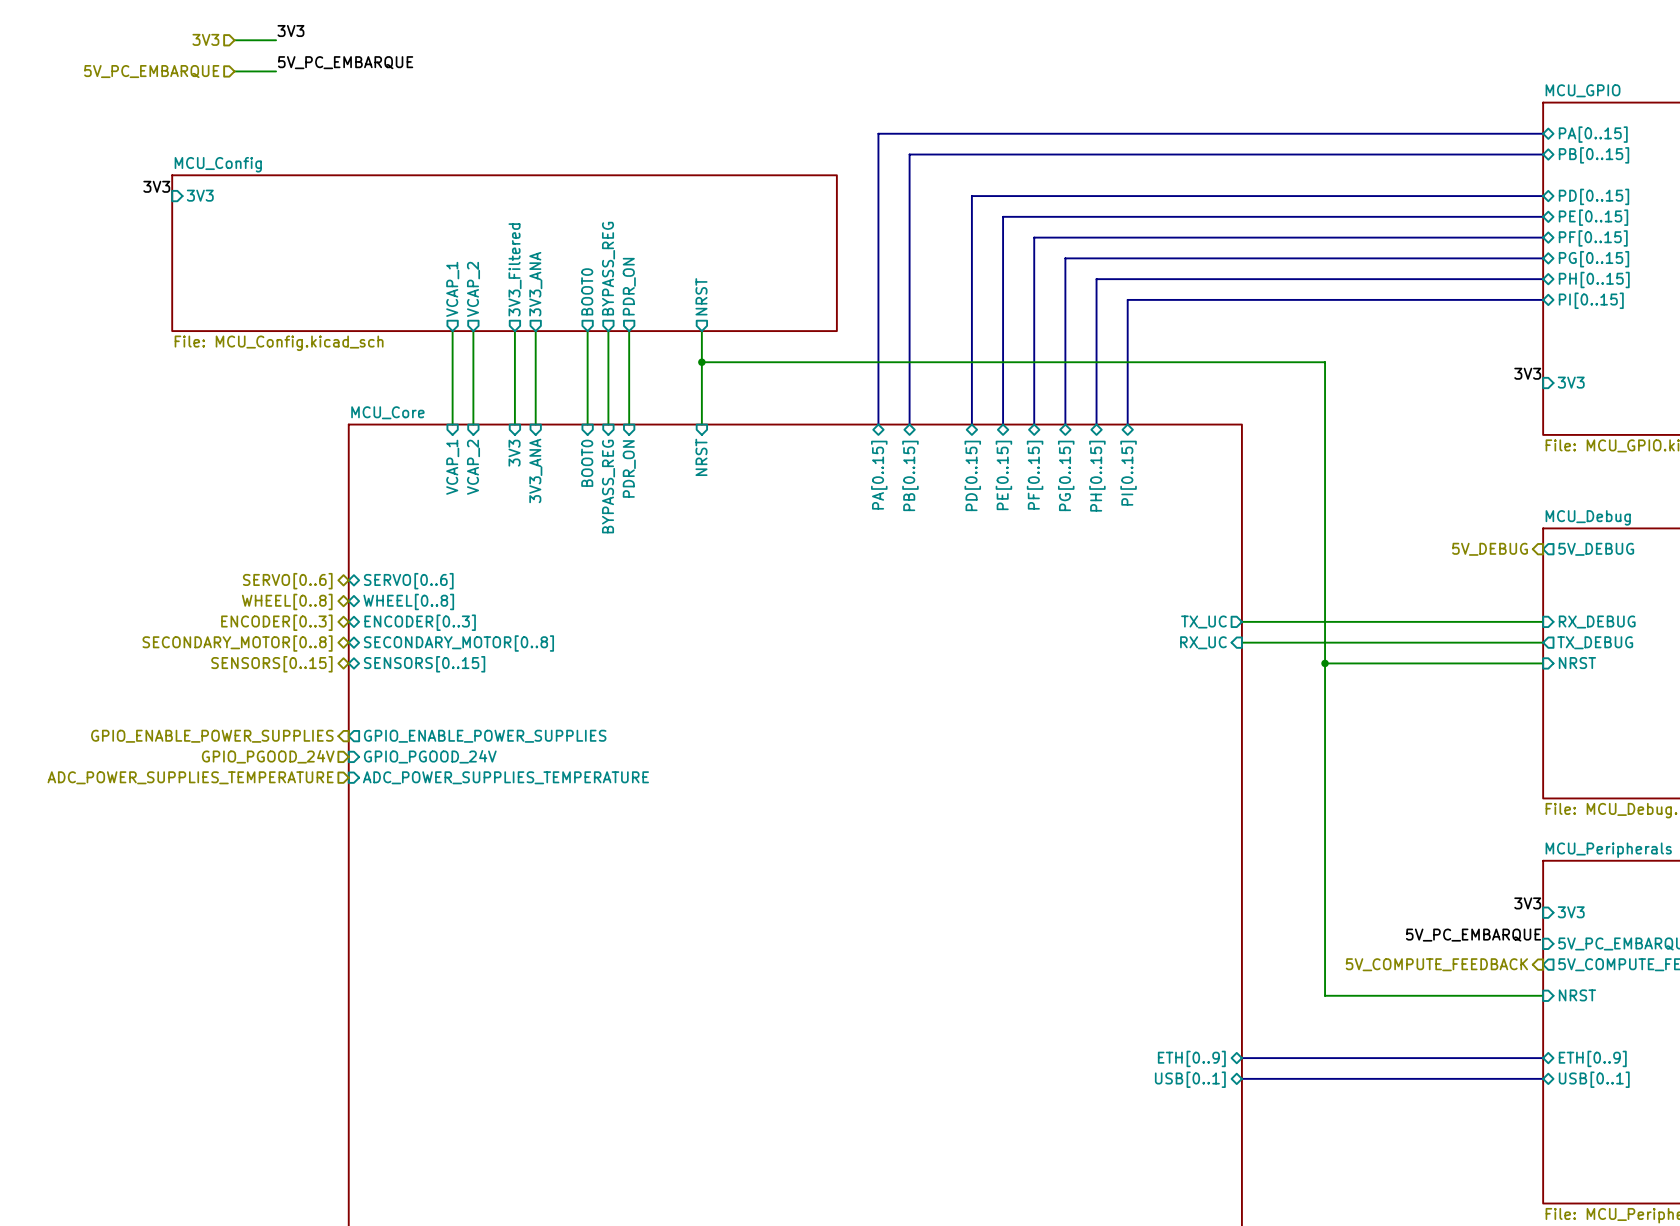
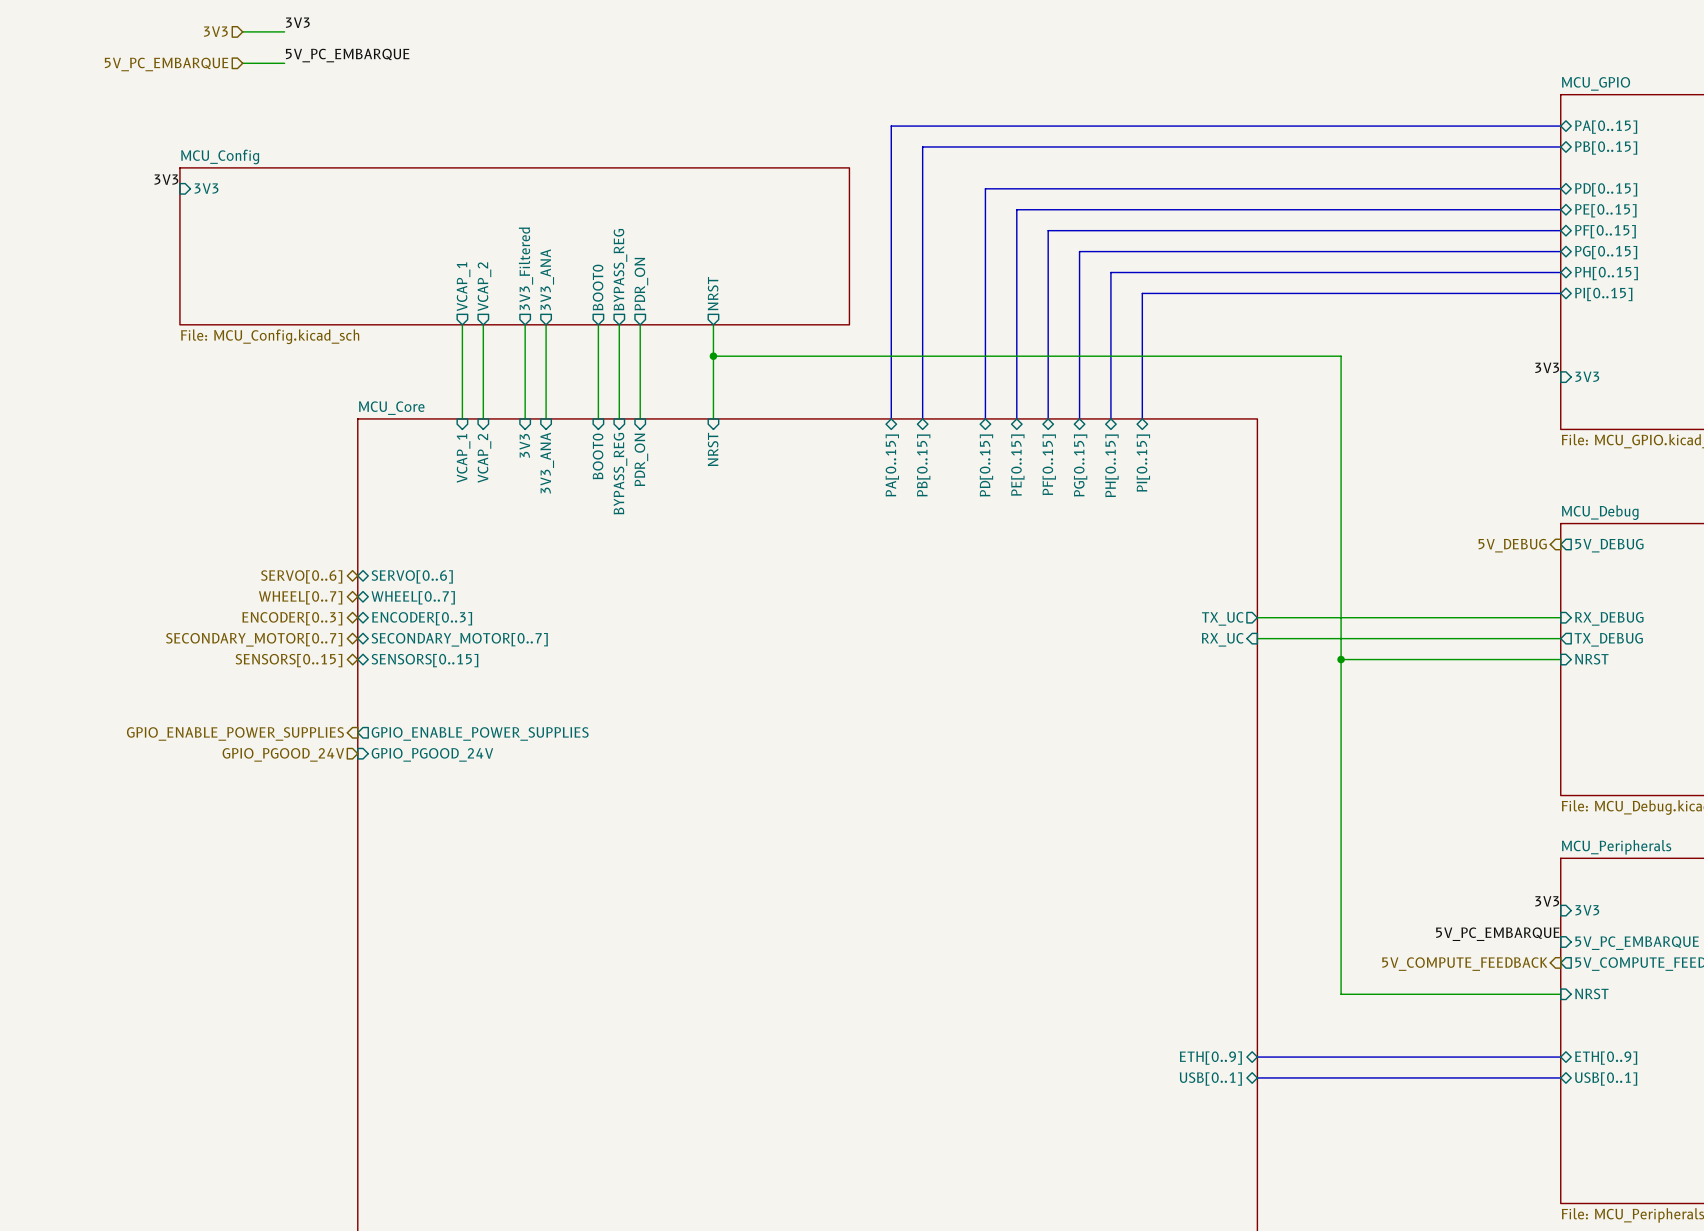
hierarchical label: WHEEL[0..8] (287, 601) -> WHEEL[0..7] (300, 597)
sheet pin: WHEEL[0..8] (408, 601) -> WHEEL[0..7] (413, 597)
hierarchical label: SECONDARY_MOTOR[0..8] (237, 643) -> SECONDARY_MOTOR[0..7] (254, 639)
sheet pin: SECONDARY_MOTOR[0..8] (458, 643) -> SECONDARY_MOTOR[0..7] (459, 639)
hierarchical label: ADC_POWER_SUPPLIES_TEMPERATURE (190, 777) -> none
sheet pin: ADC_POWER_SUPPLIES_TEMPERATURE (505, 777) -> none

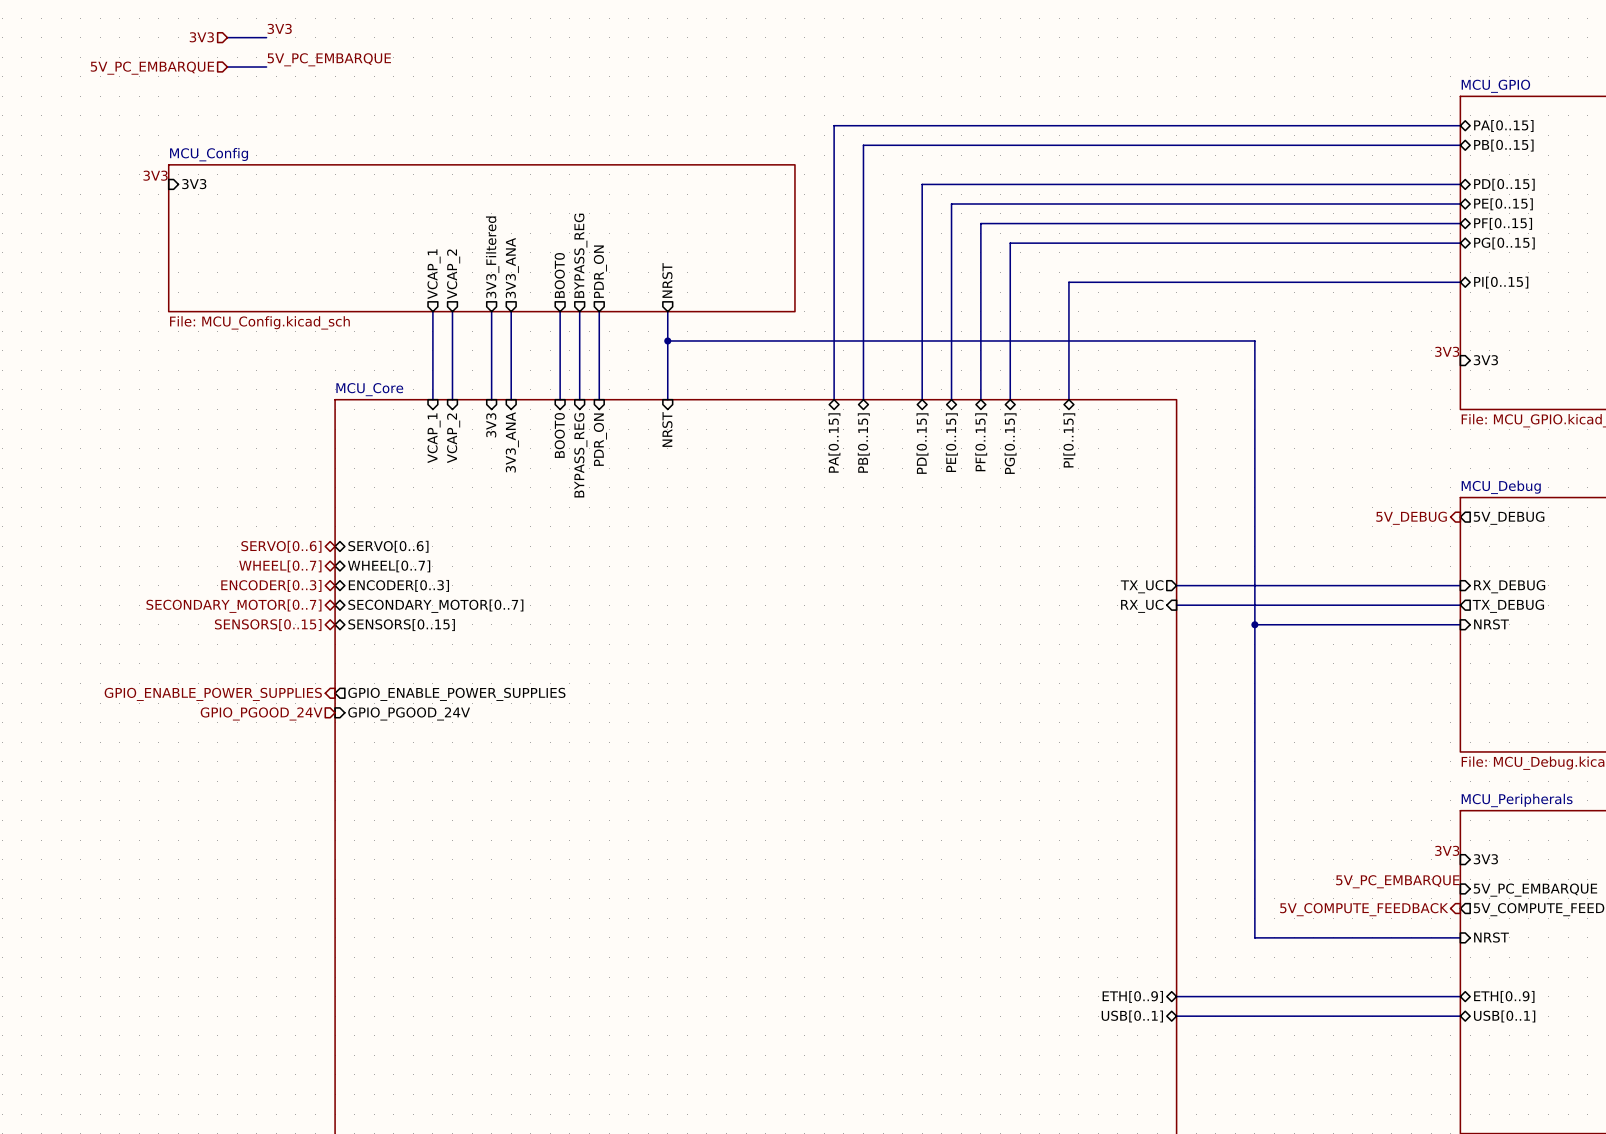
bus: (1560, 272) (1110, 272) (1110, 418) -> none
sheet pin: PH[0..15] (1606, 273) -> none
sheet pin: PH[0..15] (1112, 465) -> none

